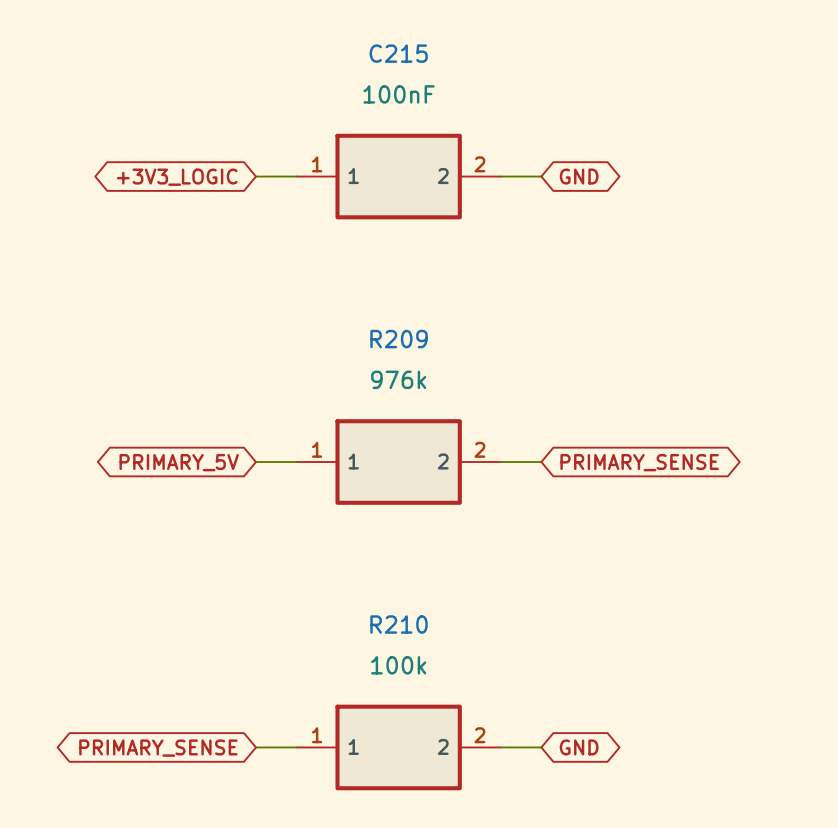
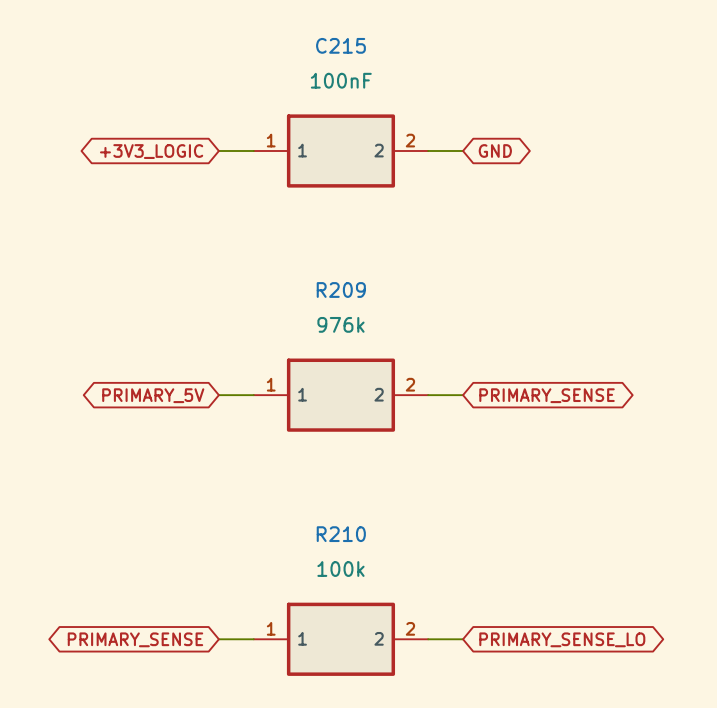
global label: GND (579, 747) -> PRIMARY_SENSE_LO (562, 639)

